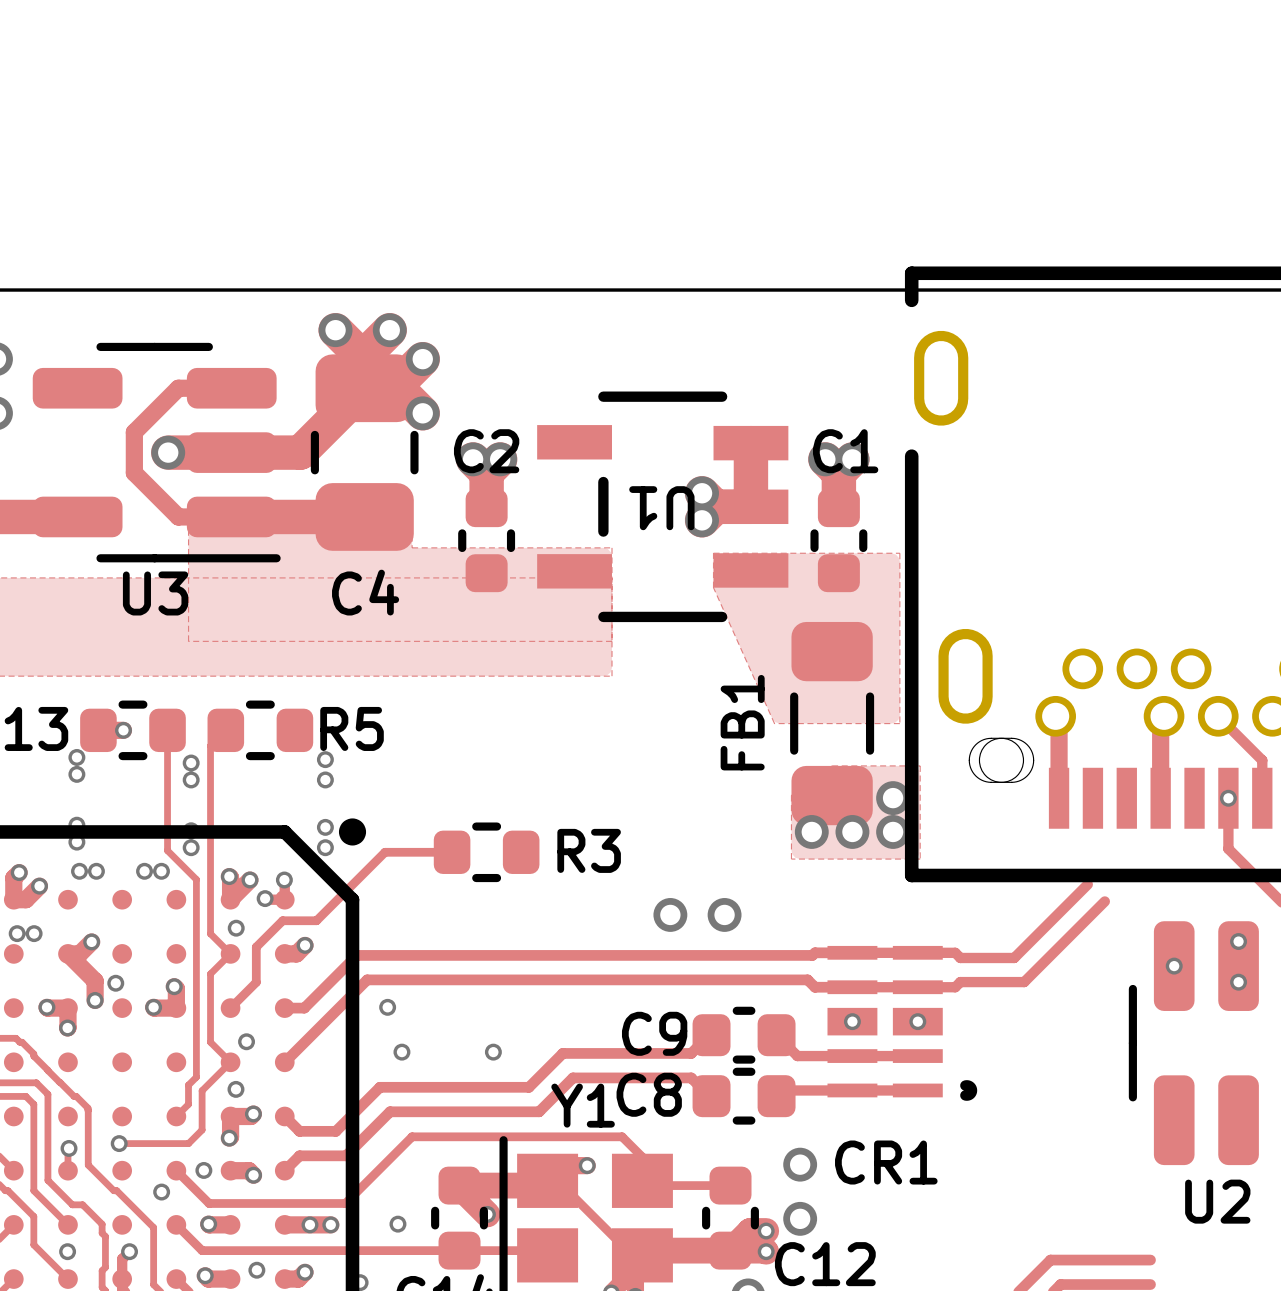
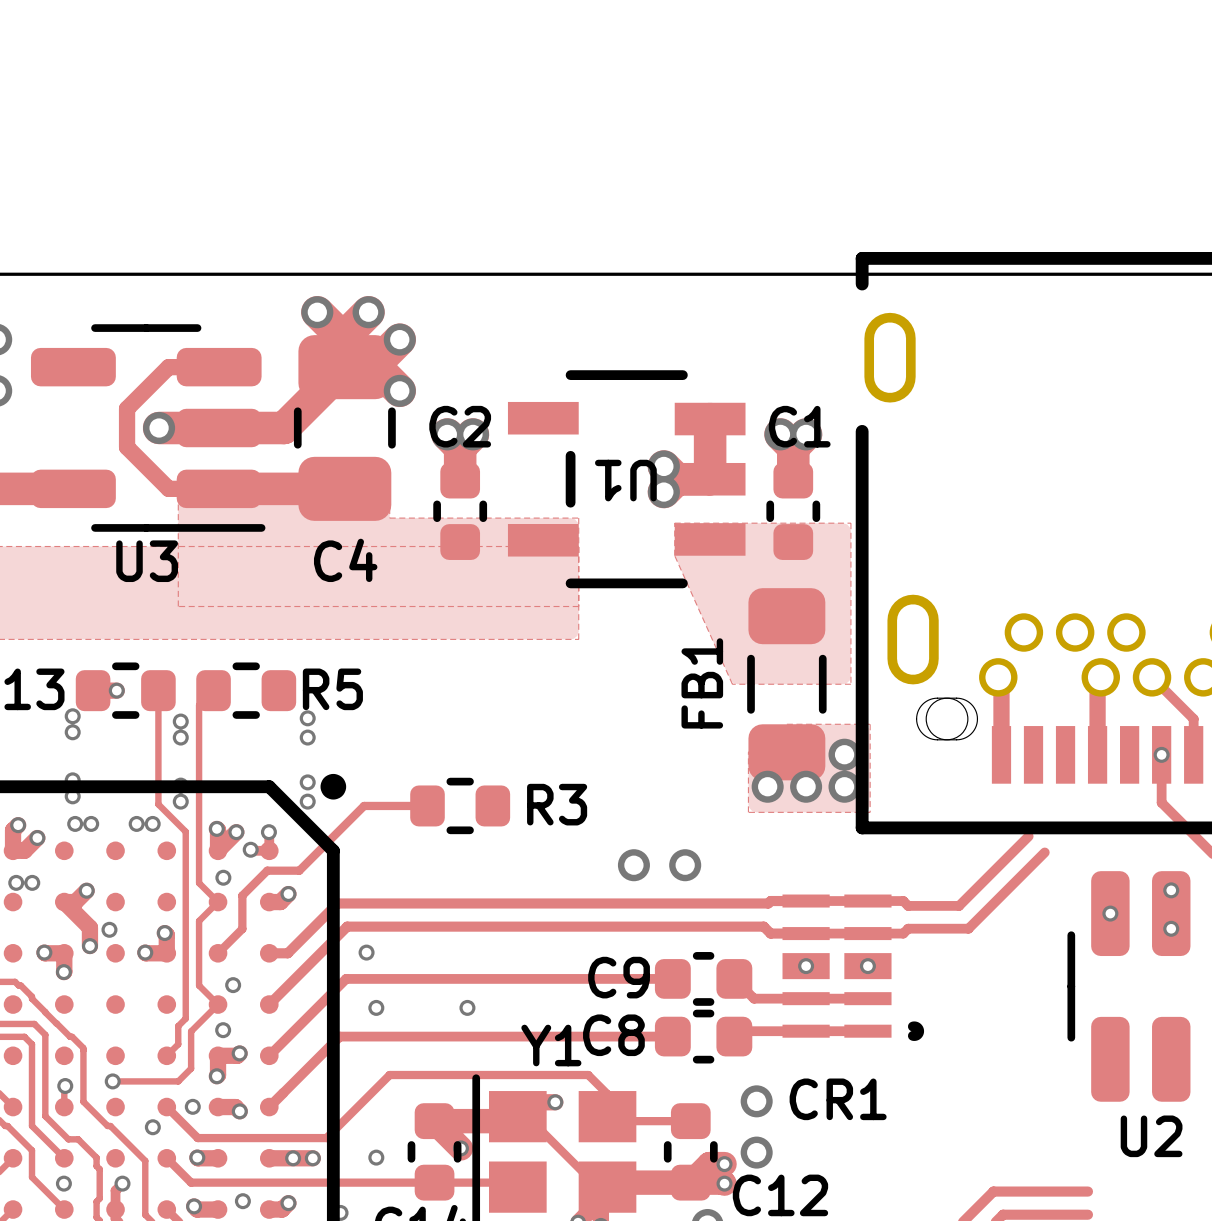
track: (709, 1035) (691, 1053) (562, 1053) (528, 1087) (379, 1087) (335, 1131) (299, 1131) (284, 1116) -> (672, 978) (346, 978) (269, 1055)
via position: (401, 1052) -> (376, 1007)
via position: (493, 1052) -> (467, 1007)
track: (709, 1096) (691, 1077) (572, 1077) (539, 1111) (390, 1111) (346, 1155) (299, 1155) -> (672, 1036) (339, 1036) (283, 1092)

